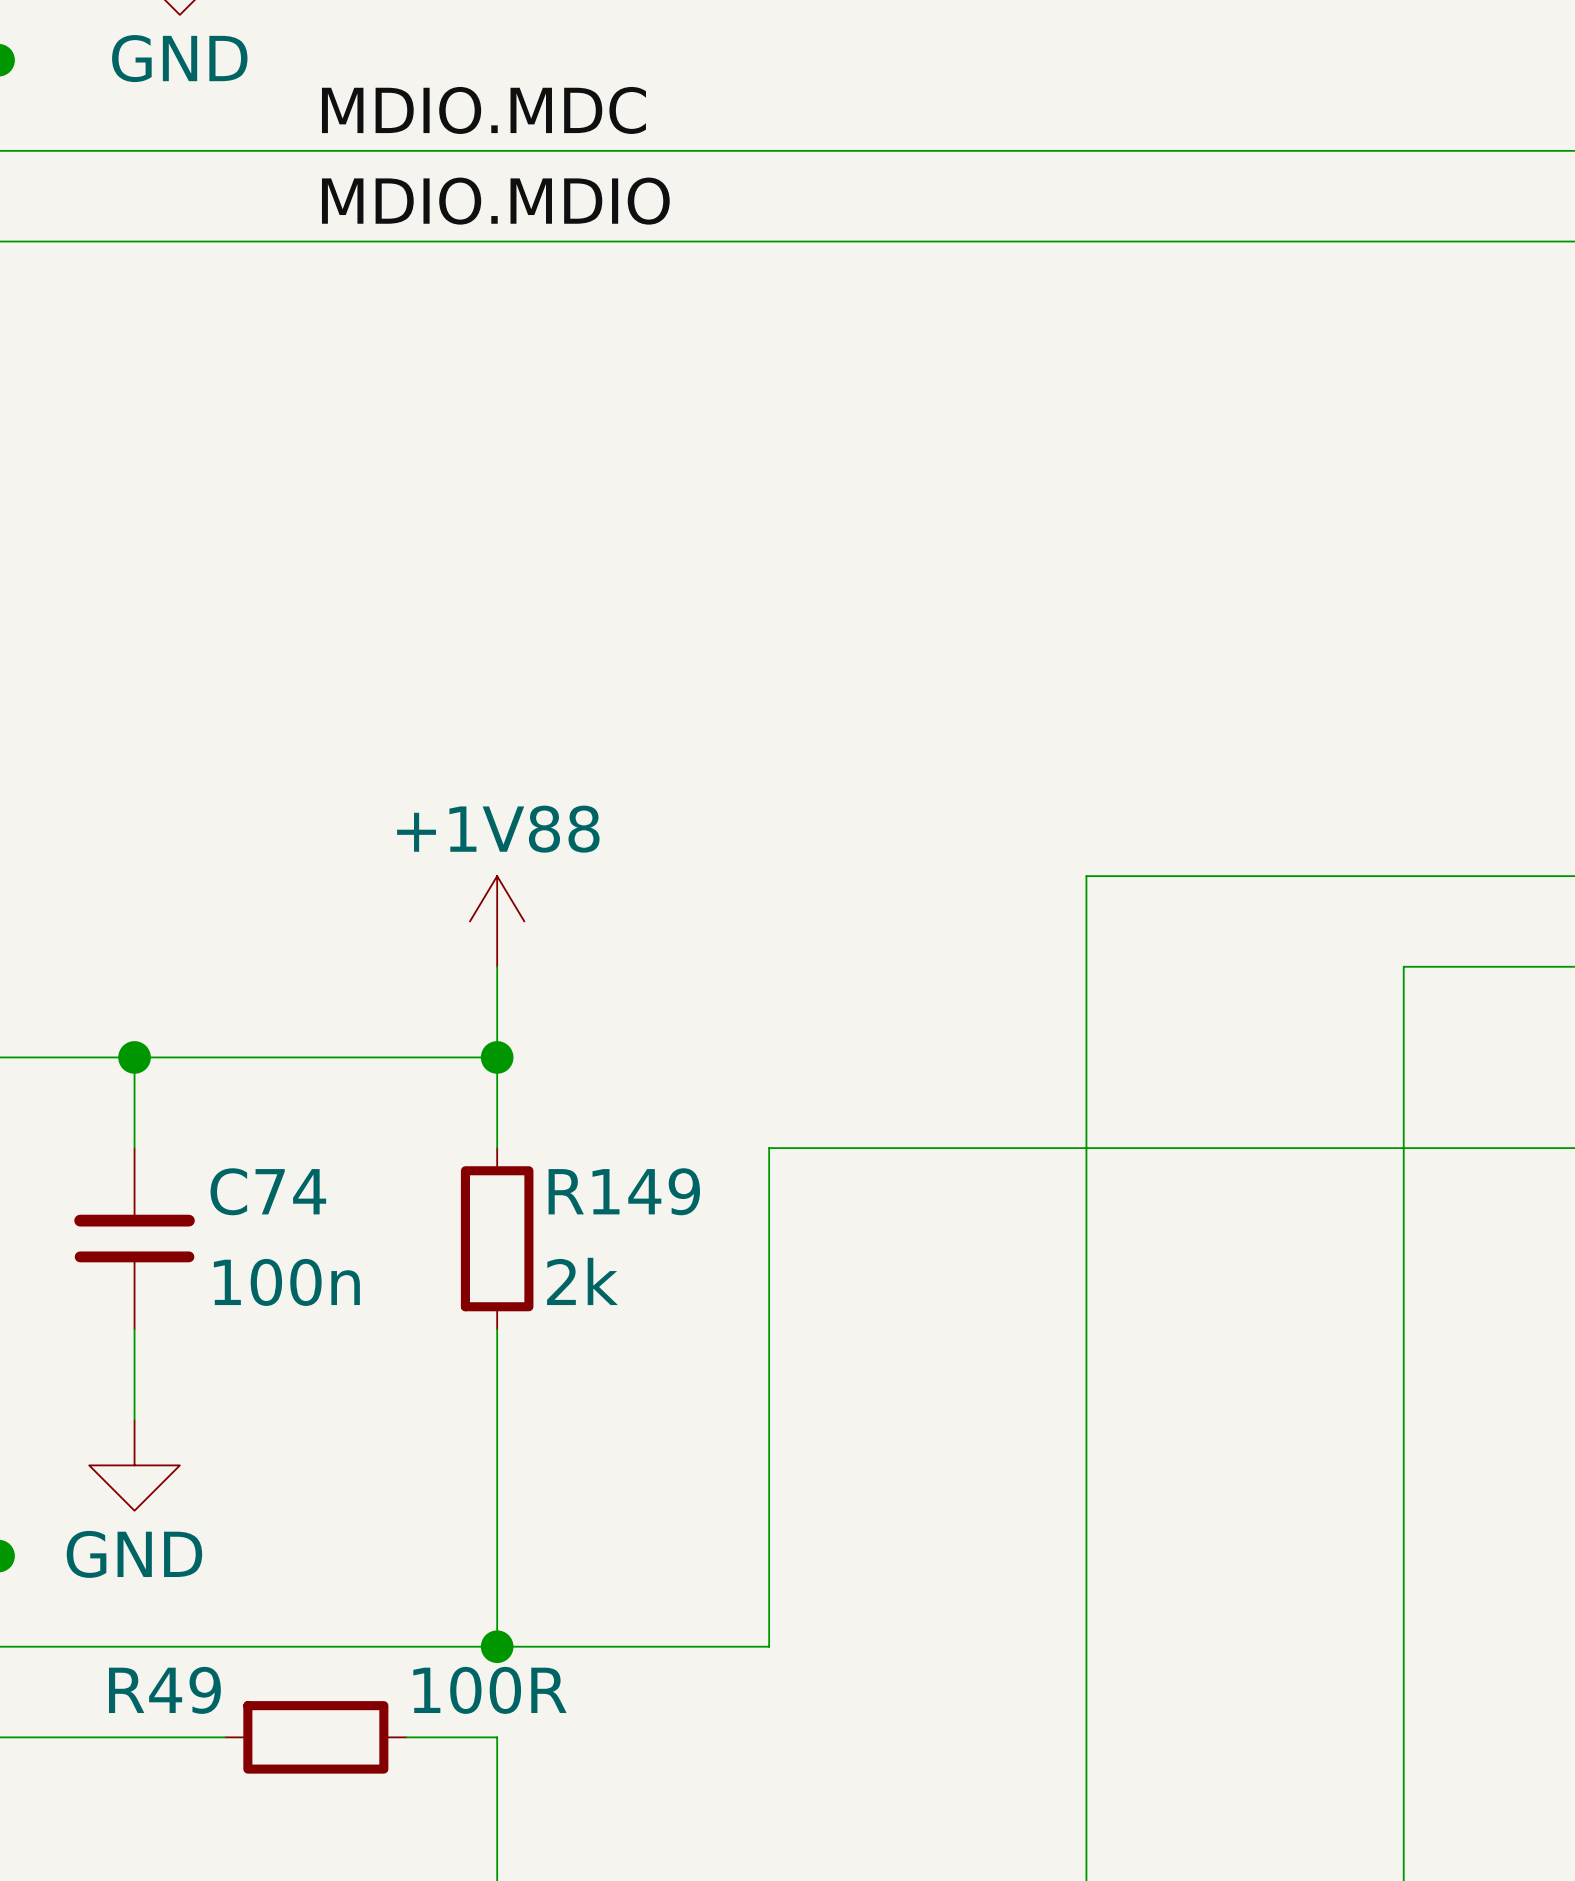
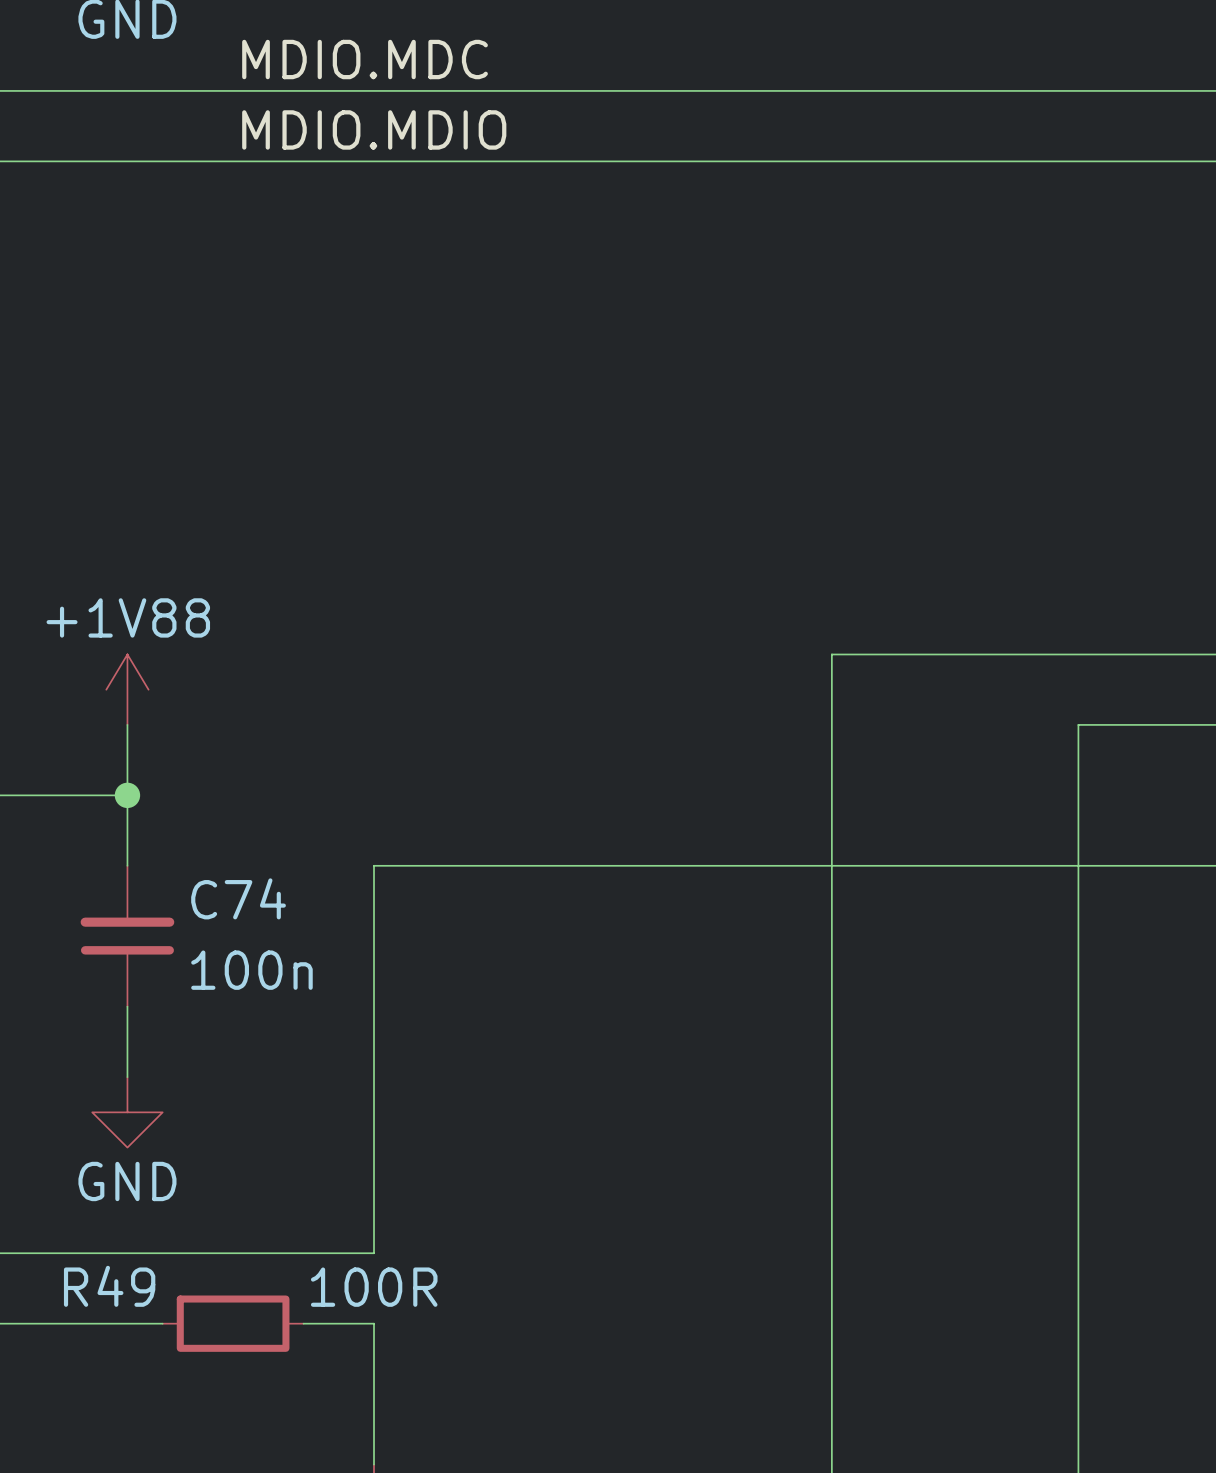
power symbol position: +1V88 (497, 921) -> +1V88 (127, 689)
wire: (497, 966) (497, 1148) -> (127, 724) (127, 865)
wire: (134, 1057) (134, 1148) -> none
junction position: (134, 1057) -> (127, 795)
wire: (179, 1057) (497, 1057) -> none
junction: (497, 1057) -> none
wire: (769, 1148) (769, 1646) (497, 1646) -> (585, 865) (374, 865) (374, 1006)
C74 position: (134, 1238) -> (127, 936)
R149: (497, 1238) -> none
wire: (134, 1329) (134, 1420) -> (127, 1006) (127, 1077)
power symbol position: GND (134, 1465) -> GND (127, 1112)
junction: (497, 1646) -> none

